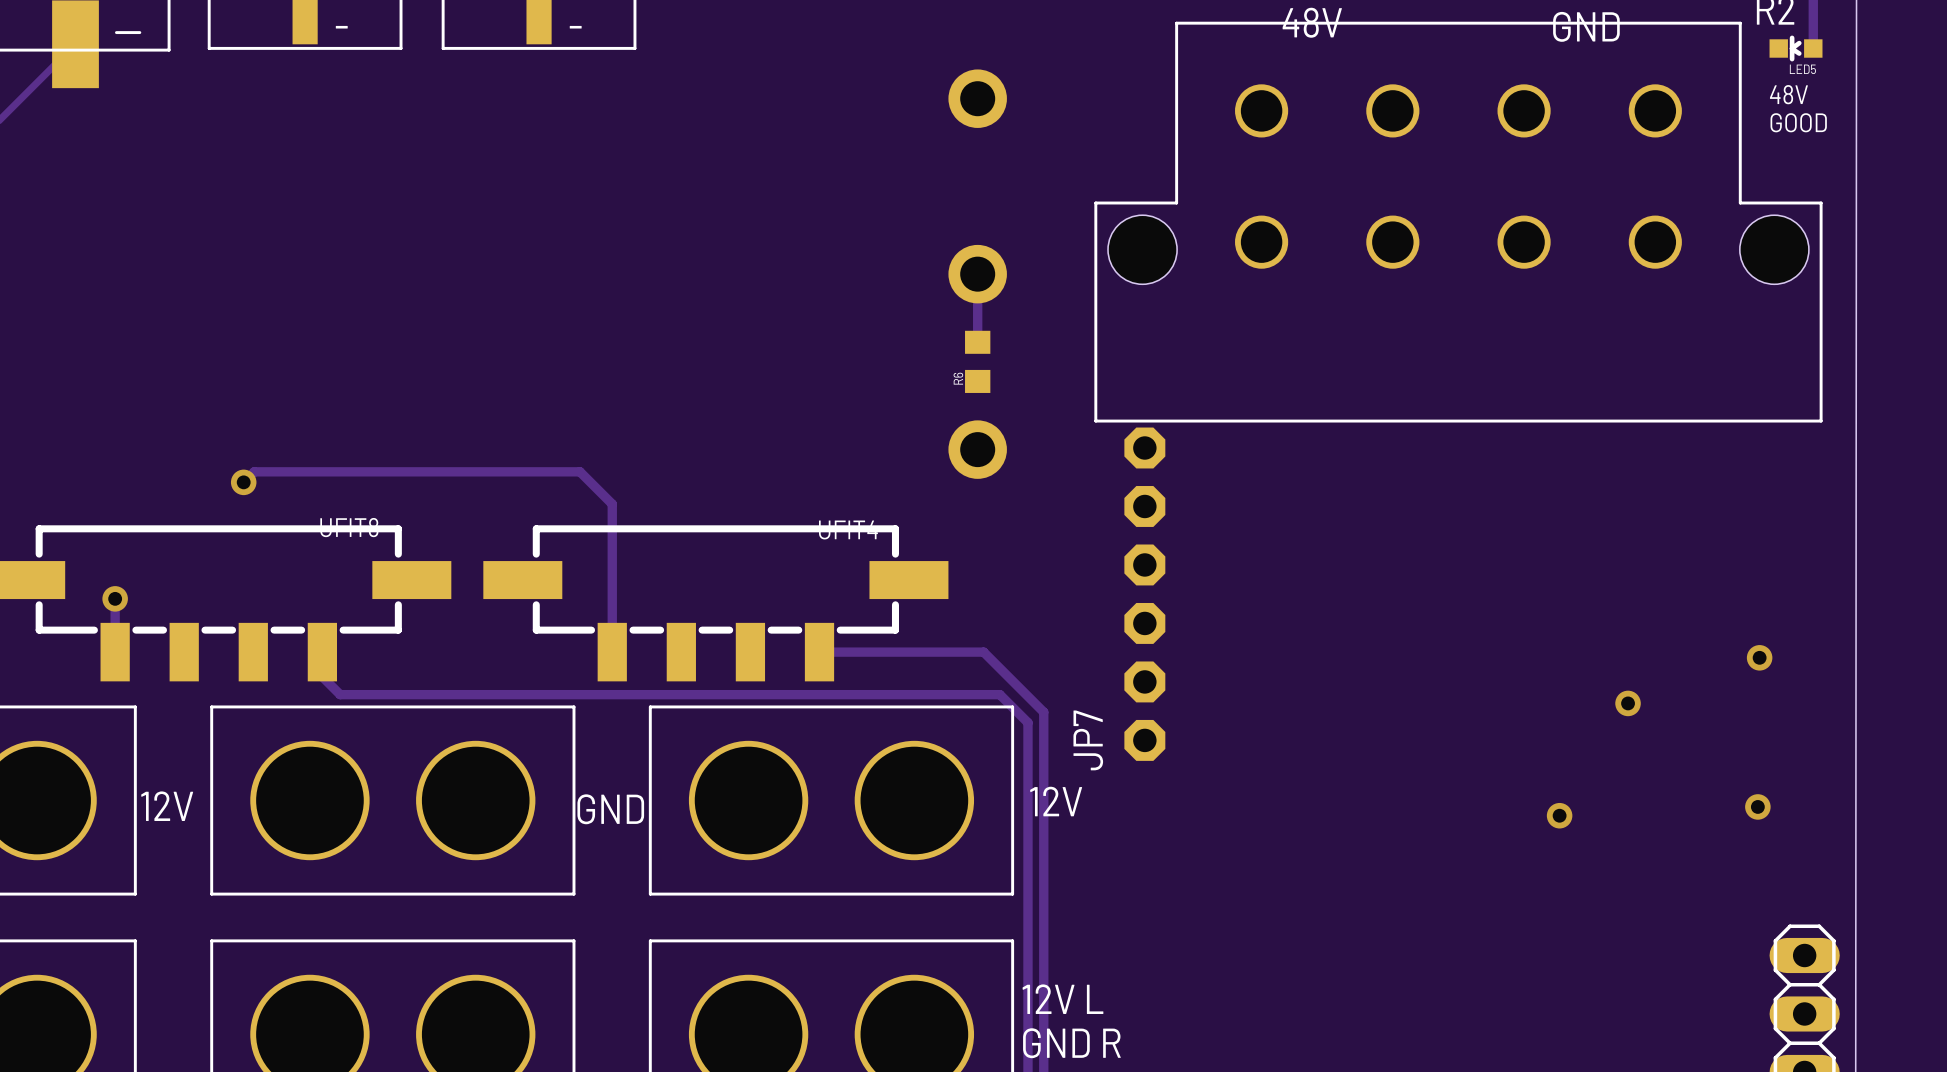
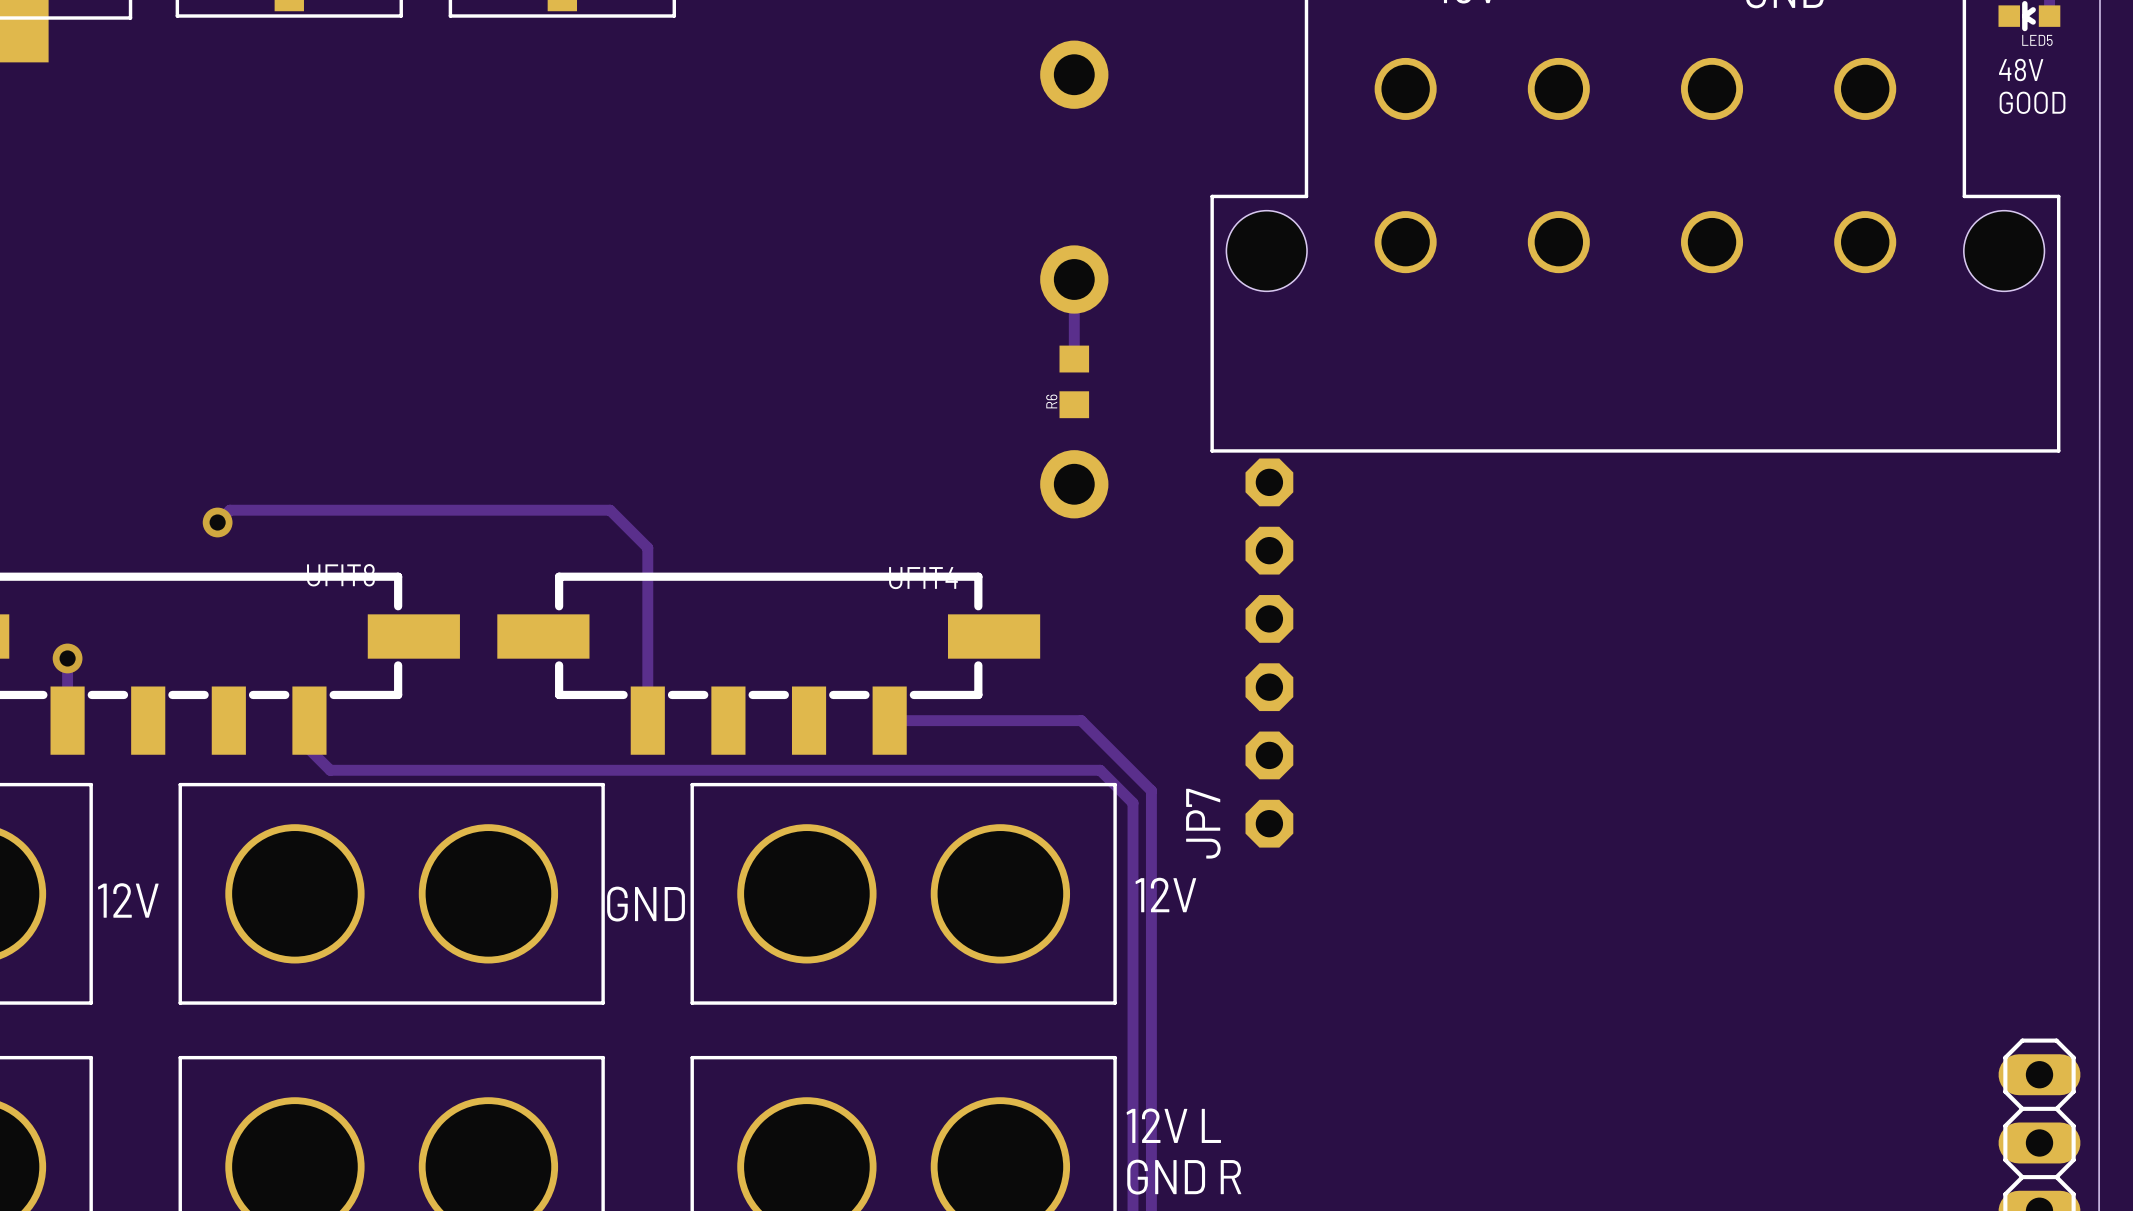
via: (1759, 657) -> none
via: (1628, 703) -> none
via: (1757, 806) -> none
via: (1559, 815) -> none

